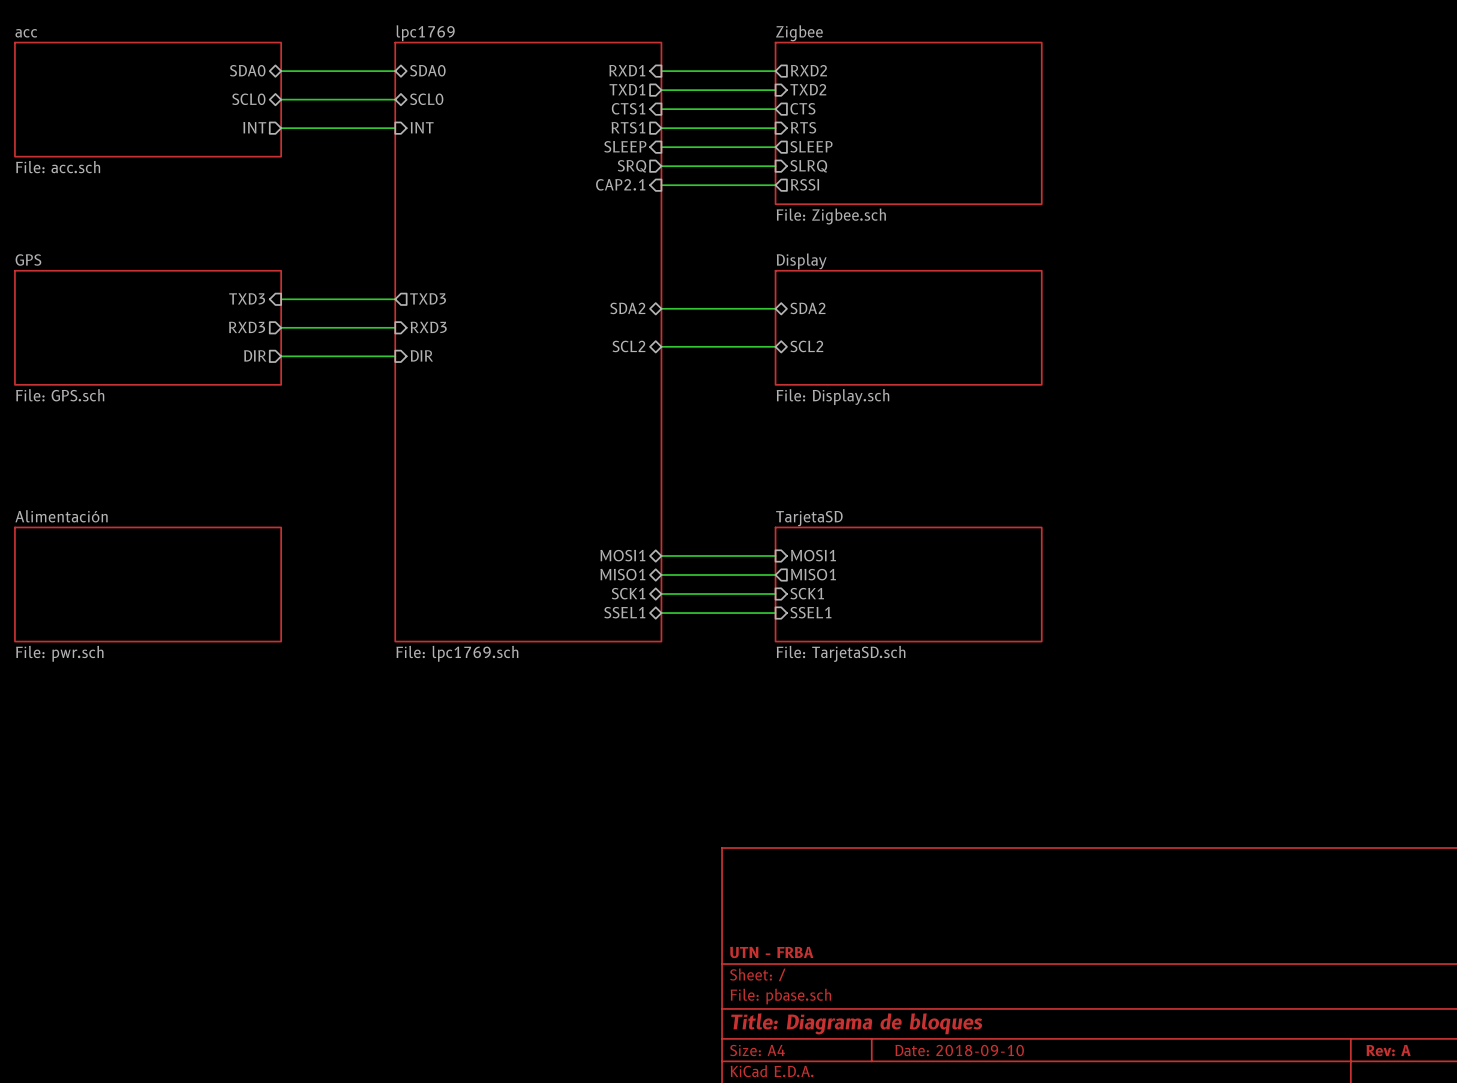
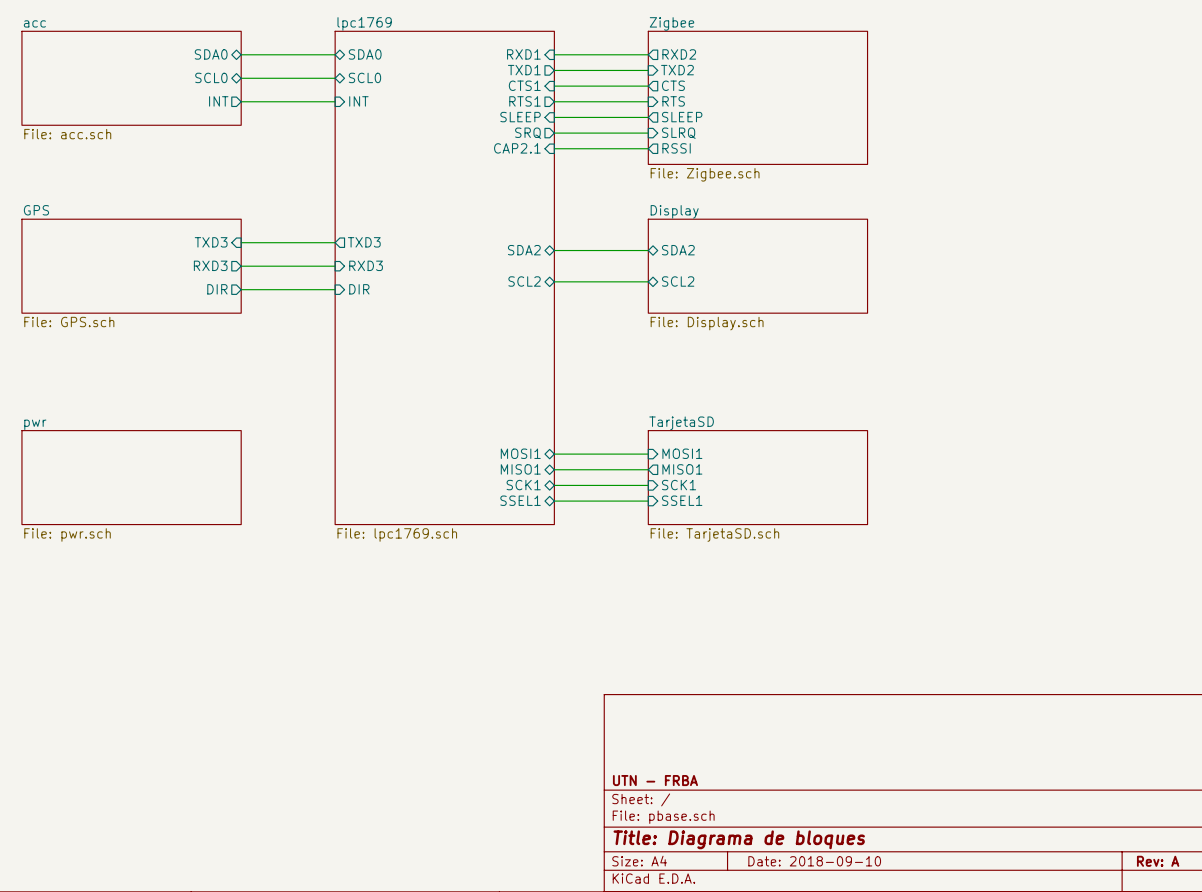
sheet Alimentación name: Alimentación (61, 516) -> pwr (35, 424)

